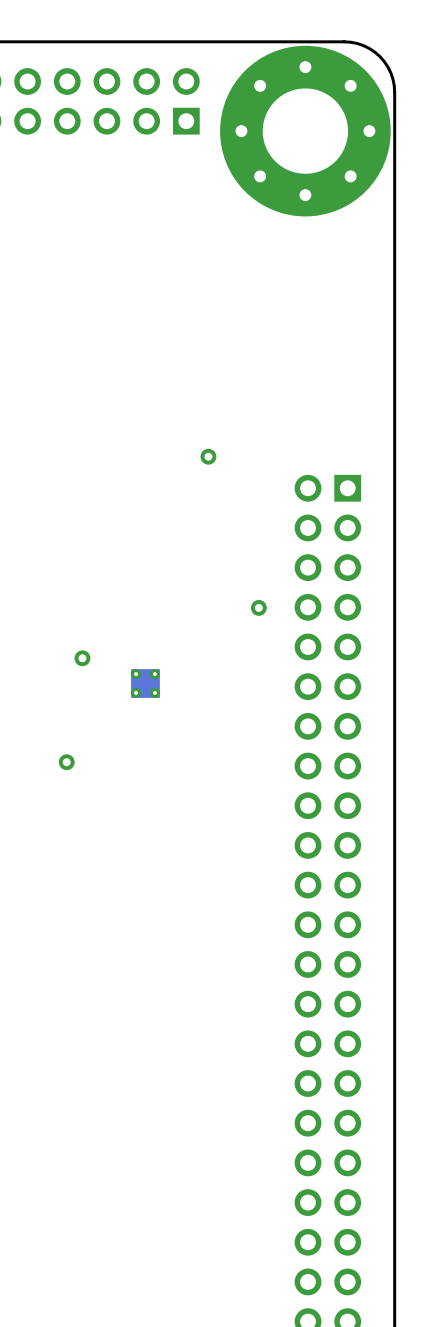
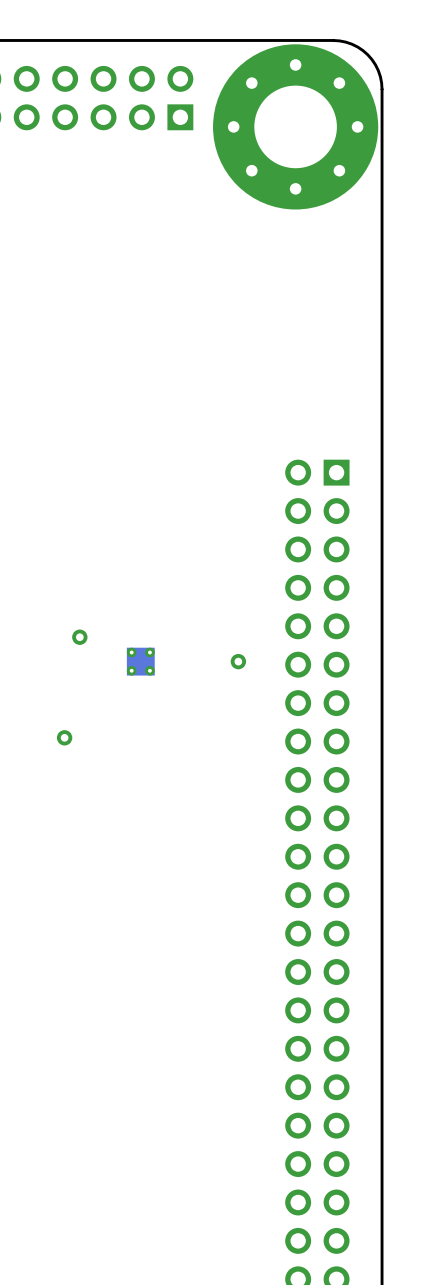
via: (208, 456) -> none
via position: (258, 607) -> (238, 661)

